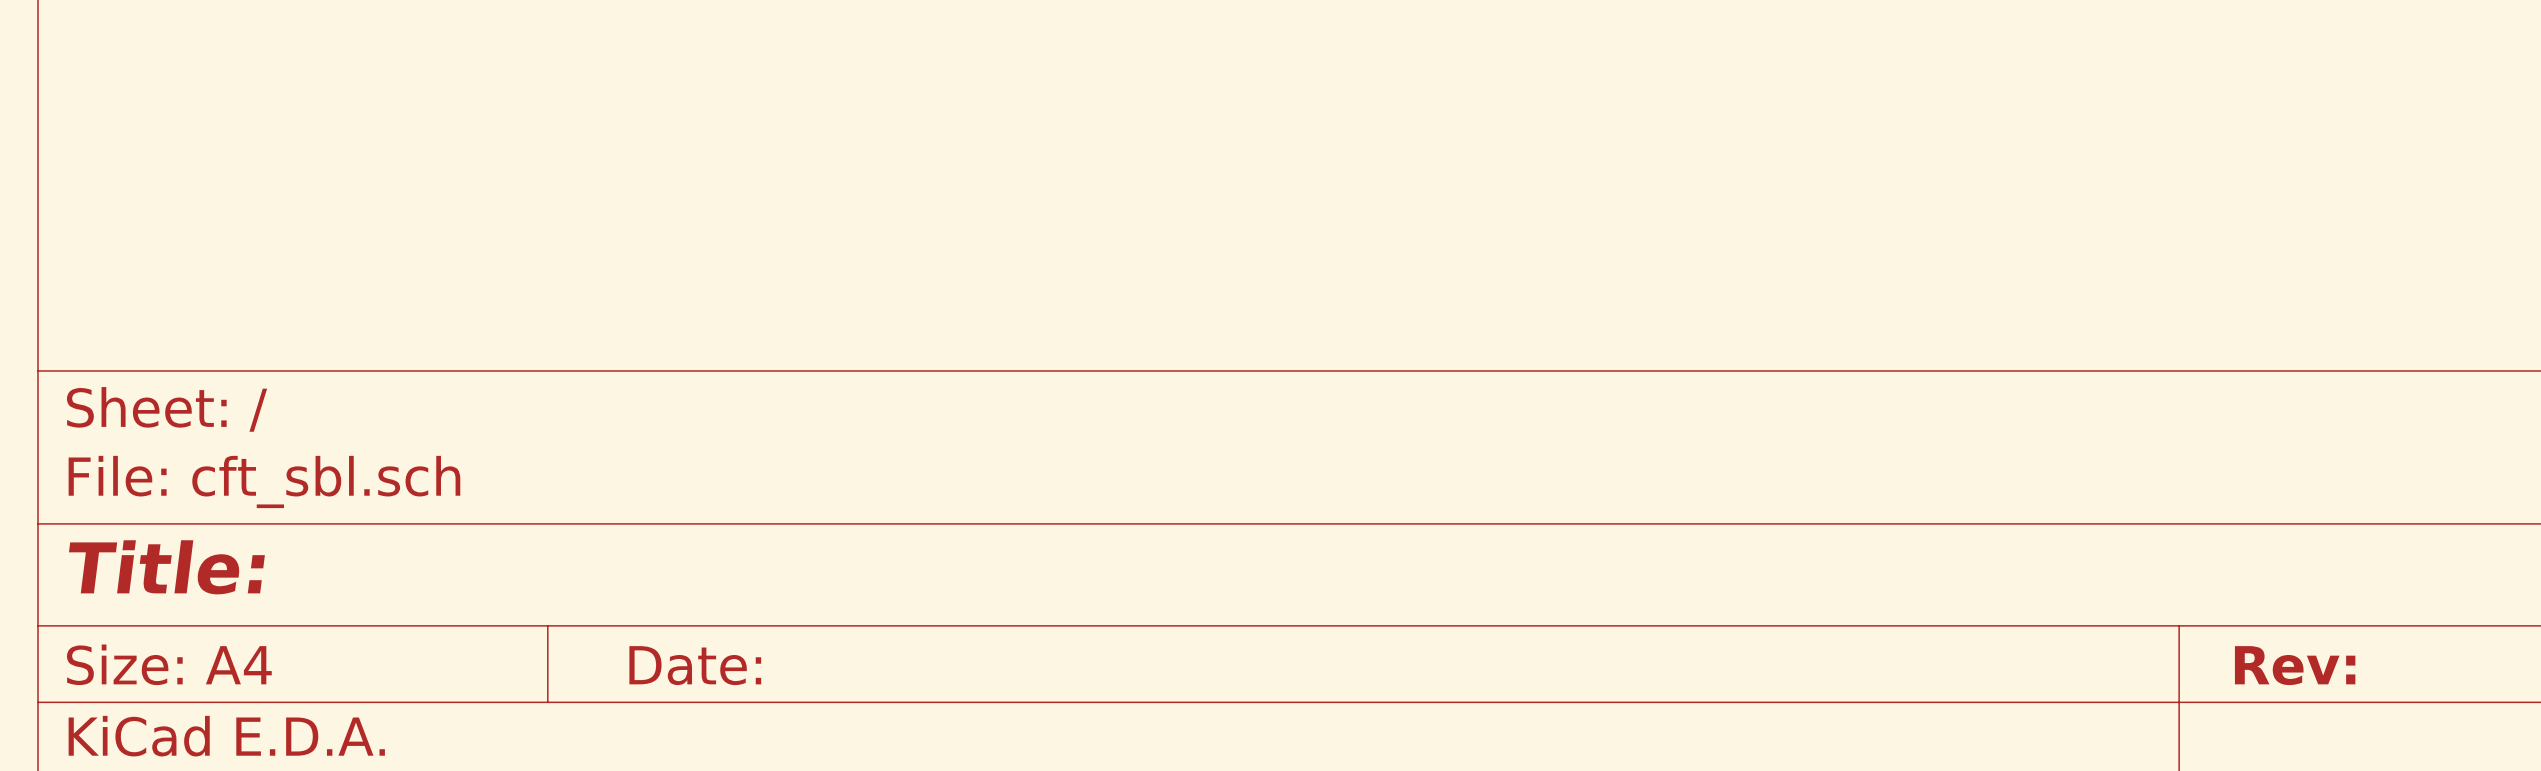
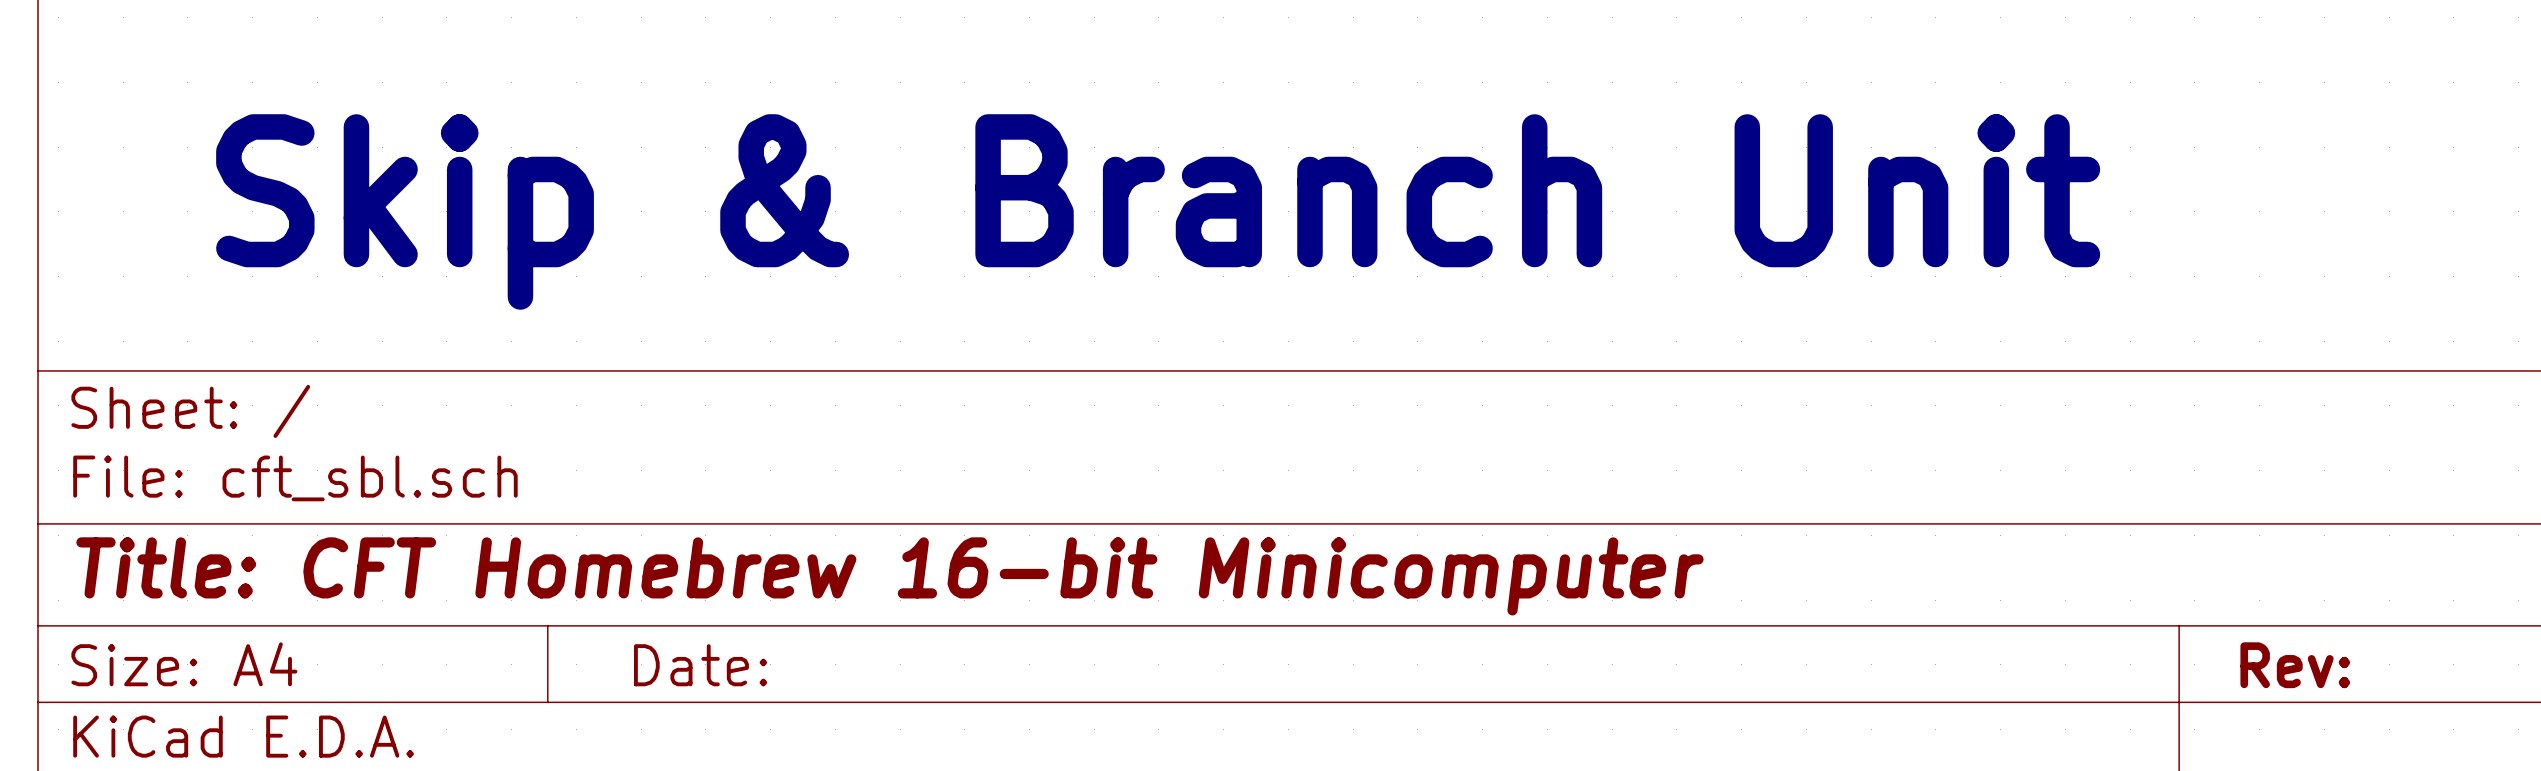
text: none -> Skip & Branch Unit (1158, 211)
title block: Title: (166, 567) -> Title: CFT Homebrew 16-bit Minicomputer (889, 576)

